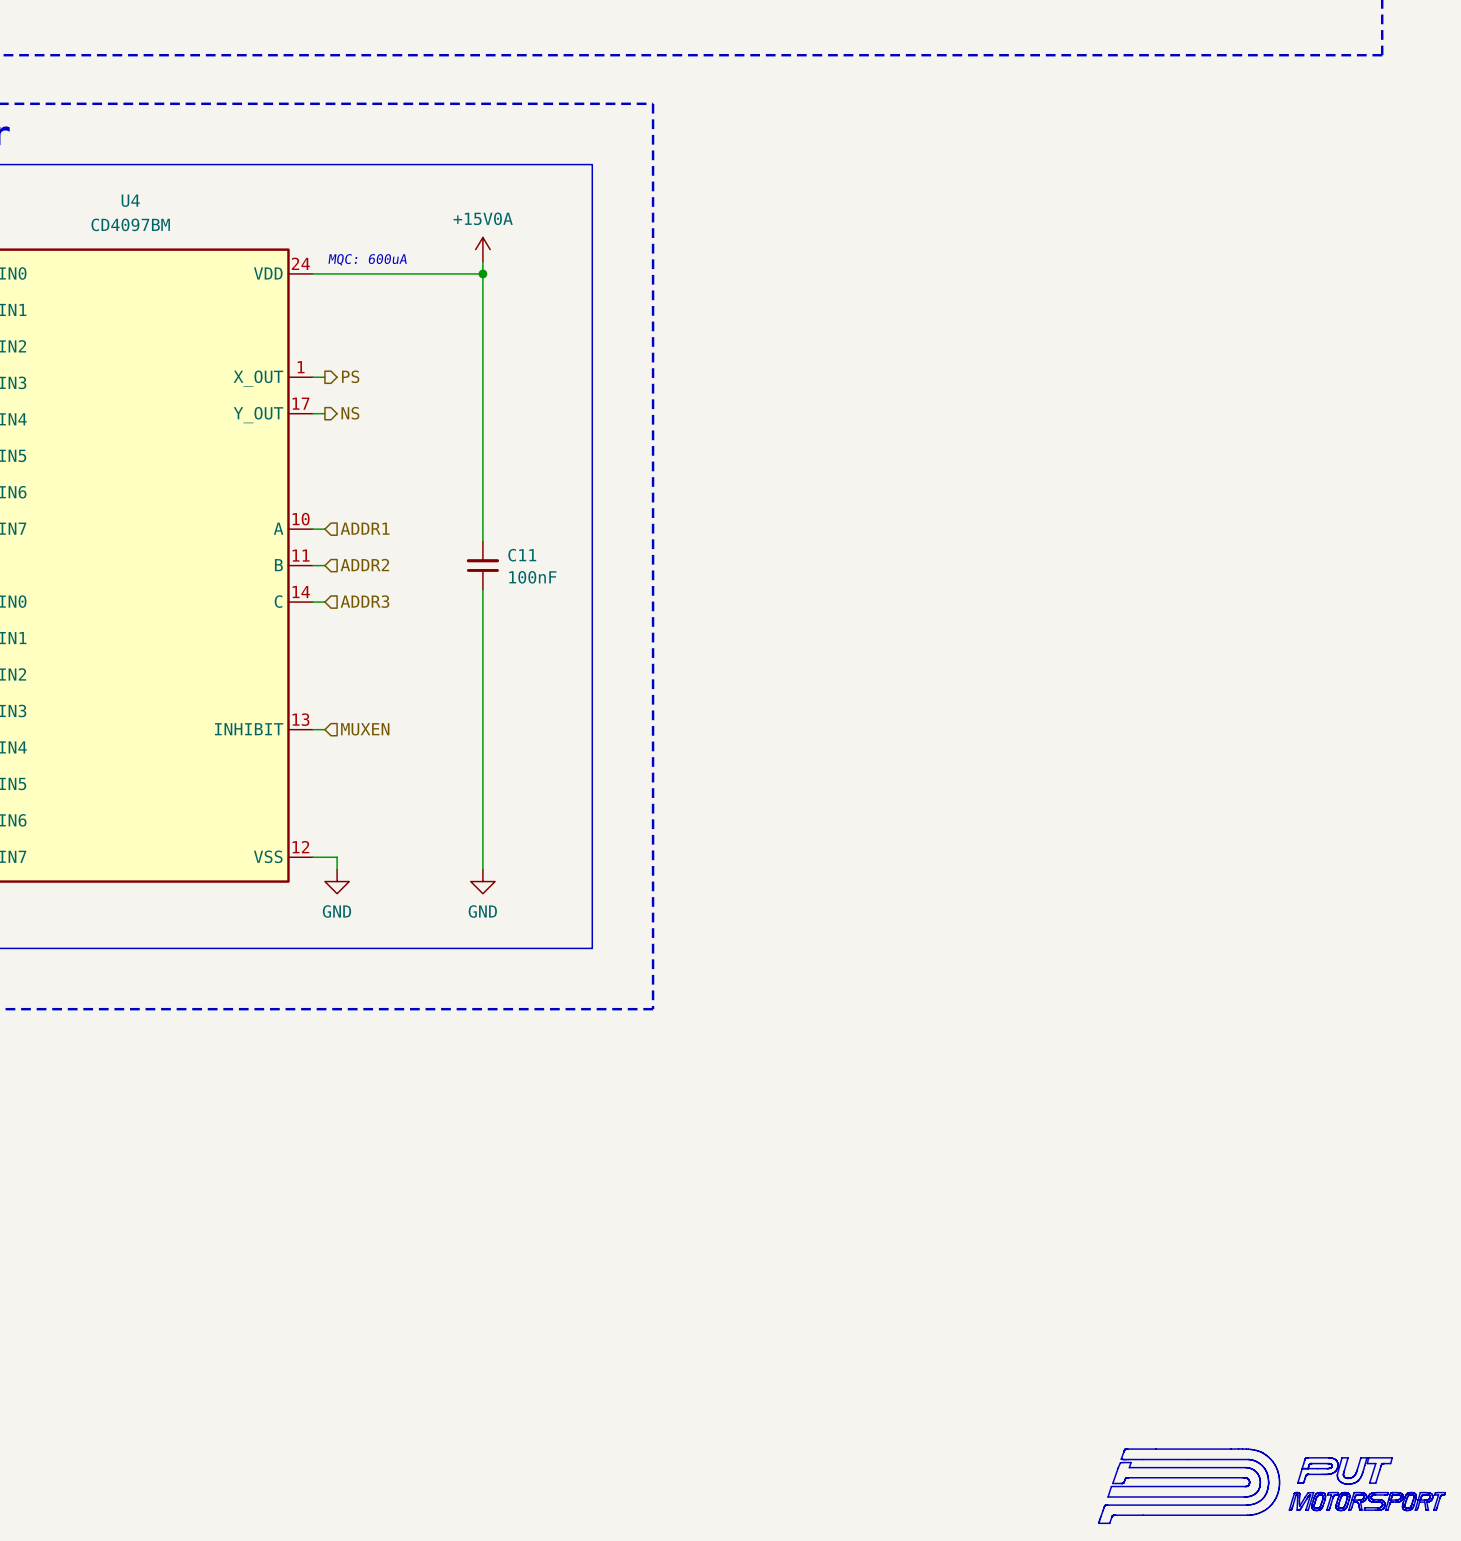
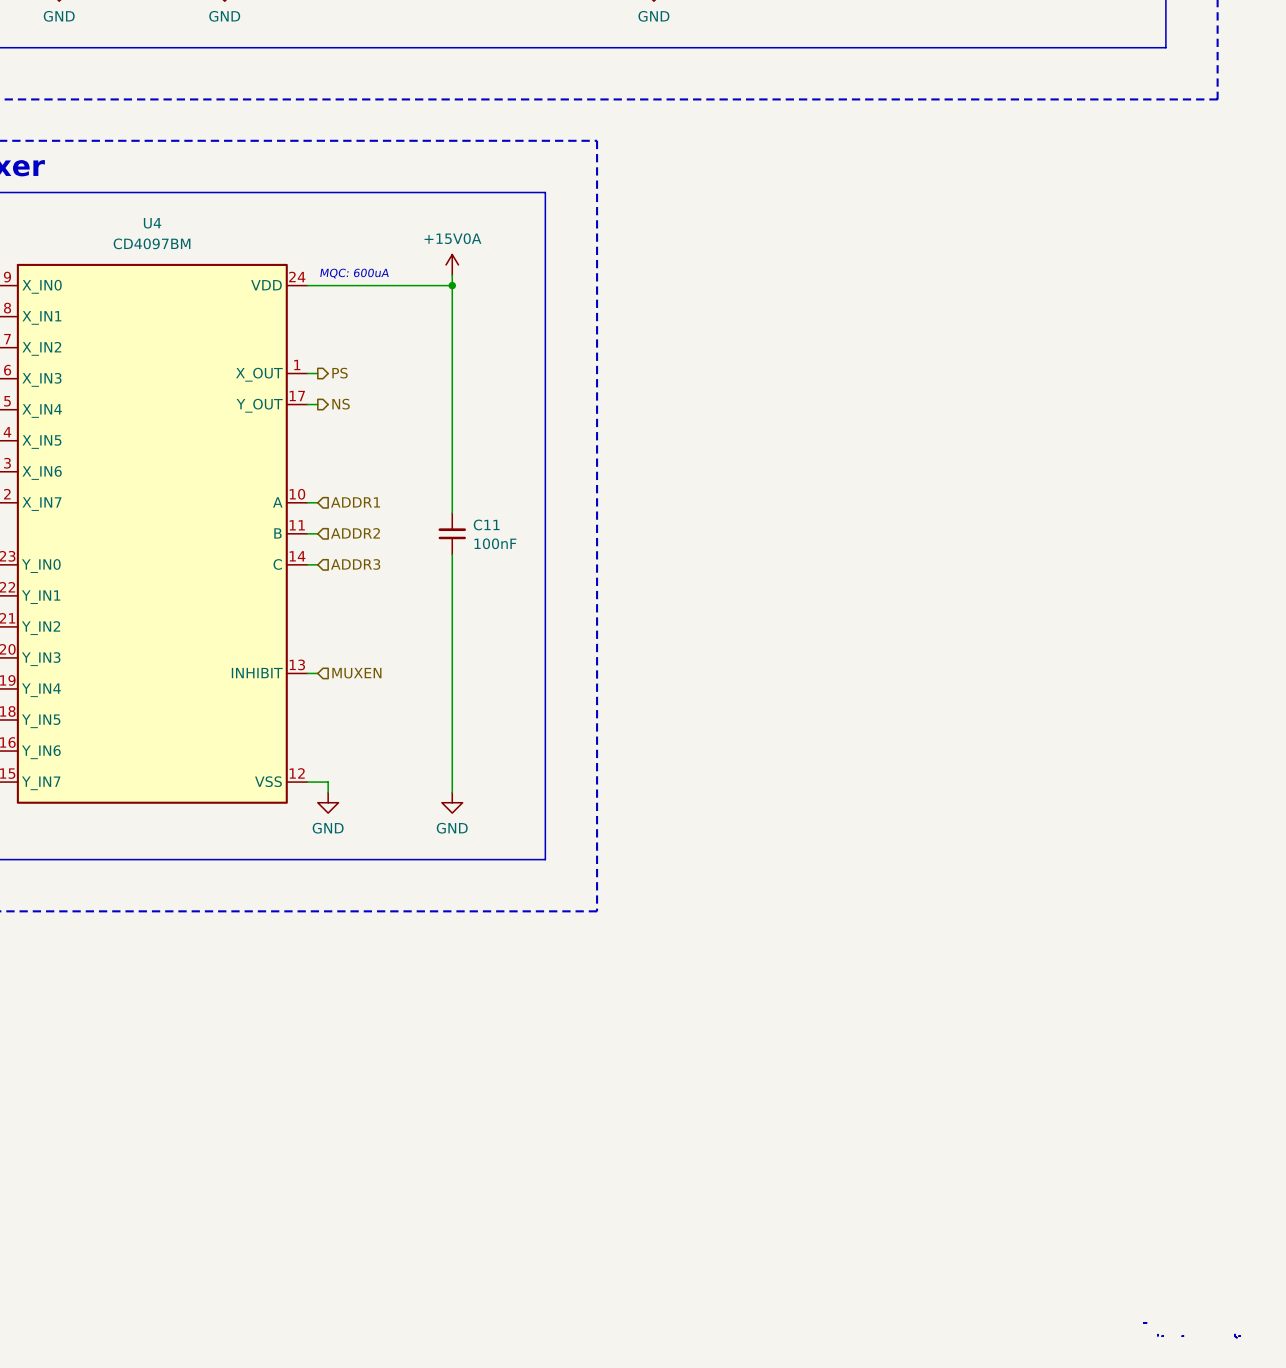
line: (1124, 1449) (1121, 1459) (1253, 1460) (1261, 1464) (1266, 1471) (1268, 1481) (1267, 1490) (1260, 1500) (1249, 1504) (1107, 1505) -> none
line: (1126, 1449) (1256, 1450) (1266, 1455) (1275, 1464) (1279, 1476) (1278, 1489) (1269, 1506) (1252, 1514) (1114, 1515) -> none
line: (1307, 1457) (1332, 1458) (1336, 1460) (1337, 1464) (1336, 1470) (1331, 1473) (1308, 1474) -> none
line: (1305, 1458) (1302, 1468) -> none
line: (1311, 1463) (1330, 1464) -> none
line: (1382, 1463) (1390, 1463) (1392, 1457) (1368, 1457) (1367, 1463) (1375, 1463) (1369, 1483) (1375, 1483) (1381, 1464) -> none
line: (1309, 1464) (1308, 1468) -> none
line: (1330, 1467) (1302, 1468) -> none
line: (1302, 1468) (1297, 1483) (1302, 1482) -> none
line: (1306, 1475) (1303, 1482) -> none
line: (1343, 1475) (1348, 1457) (1342, 1457) (1337, 1477) (1340, 1482) (1347, 1484) (1354, 1482) (1360, 1478) (1367, 1457) (1360, 1457) (1353, 1476) (1347, 1478) (1343, 1475) -> none
line: (1127, 1477) (1247, 1478) -> none
line: (1125, 1478) (1123, 1482) -> none
line: (1248, 1478) (1249, 1483) (1245, 1486) (1111, 1486) (1108, 1497) (1246, 1496) (1255, 1493) (1260, 1485) (1257, 1473) (1248, 1467) (1129, 1467) (1131, 1462) (1122, 1462) (1120, 1462) (1112, 1483) (1121, 1483) -> none
line: (1322, 1492) (1317, 1493) -> none
line: (1323, 1492) (1325, 1497) (1321, 1508) (1316, 1510) (1312, 1508) -> none
line: (1346, 1492) (1341, 1493) -> none
line: (1347, 1492) (1349, 1497) (1345, 1508) (1339, 1510) (1336, 1506) -> none
line: (1392, 1492) (1400, 1493) (1403, 1497) (1400, 1501) (1392, 1502) -> none
line: (1420, 1492) (1415, 1510) (1419, 1502) (1424, 1502) (1426, 1510) (1428, 1510) (1426, 1502) (1431, 1500) (1432, 1495) (1420, 1492) -> none
line: (1294, 1493) (1290, 1510) -> none
line: (1299, 1493) (1299, 1506) (1308, 1492) (1313, 1492) (1308, 1510) (1305, 1510) (1310, 1495) -> none
line: (1340, 1493) (1336, 1506) -> none
line: (1388, 1493) (1371, 1493) (1368, 1496) (1369, 1500) -> none
line: (1390, 1493) (1388, 1500) -> none
line: (1445, 1493) (1435, 1492) (1434, 1494) (1438, 1494) (1433, 1510) (1435, 1510) -> none
line: (1316, 1494) (1312, 1504) (1314, 1506) -> none
line: (1320, 1494) (1316, 1497) (1314, 1506) -> none
line: (1321, 1494) (1323, 1497) (1319, 1507) -> none
line: (1345, 1494) (1343, 1494) -> none
line: (1385, 1494) (1372, 1495) -> none
line: (1394, 1494) (1399, 1495) -> none
line: (1411, 1494) (1409, 1494) -> none
line: (1412, 1494) (1413, 1497) (1410, 1507) -> none
line: (1444, 1494) (1442, 1495) -> none
line: (1333, 1495) (1329, 1509) -> none
line: (1334, 1495) (1337, 1494) (1338, 1492) (1328, 1492) (1327, 1494) (1331, 1494) (1326, 1510) (1328, 1510) -> none
line: (1341, 1495) (1338, 1506) -> none
line: (1356, 1495) (1363, 1495) -> none
line: (1392, 1495) (1390, 1500) -> none
line: (1408, 1495) (1404, 1506) -> none
line: (1421, 1495) (1420, 1500) -> none
line: (1423, 1495) (1429, 1495) -> none
line: (1308, 1496) (1299, 1509) -> none
line: (1347, 1496) (1344, 1507) -> none
line: (1355, 1496) (1354, 1500) -> none
line: (1440, 1496) (1436, 1509) -> none
line: (1400, 1497) (1398, 1499) (1388, 1500) -> none
line: (1363, 1499) (1351, 1500) -> none
line: (1373, 1499) (1383, 1501) (1383, 1508) (1364, 1510) (1364, 1507) (1381, 1507) -> none
line: (1429, 1499) (1418, 1500) -> none
line: (1351, 1500) (1348, 1510) (1350, 1509) (1353, 1502) (1357, 1502) -> none
line: (1351, 1500) (1354, 1492) (1365, 1494) (1365, 1499) (1360, 1502) (1361, 1510) -> none
line: (1369, 1500) (1380, 1502) -> none
line: (1388, 1500) (1385, 1510) (1387, 1510) (1389, 1504) -> none
line: (1381, 1502) (1381, 1502) -> none
line: (1358, 1503) (1359, 1509) -> none
line: (1105, 1505) (1098, 1523) (1109, 1523) (1111, 1517) -> none
line: (1404, 1506) (1402, 1505) (1406, 1494) (1414, 1493) (1416, 1497) (1412, 1507) (1405, 1510) -> none
line: (1291, 1509) (1296, 1494) (1297, 1494) (1298, 1510) -> none

